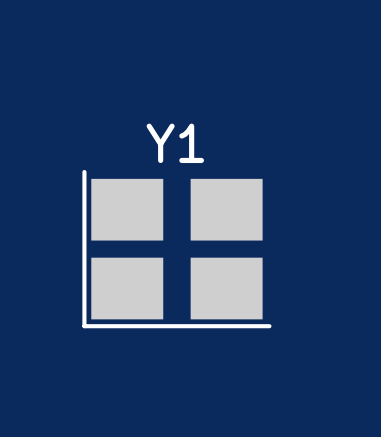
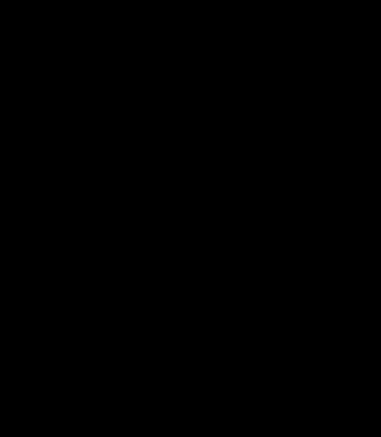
Y1: (176, 249) -> none

